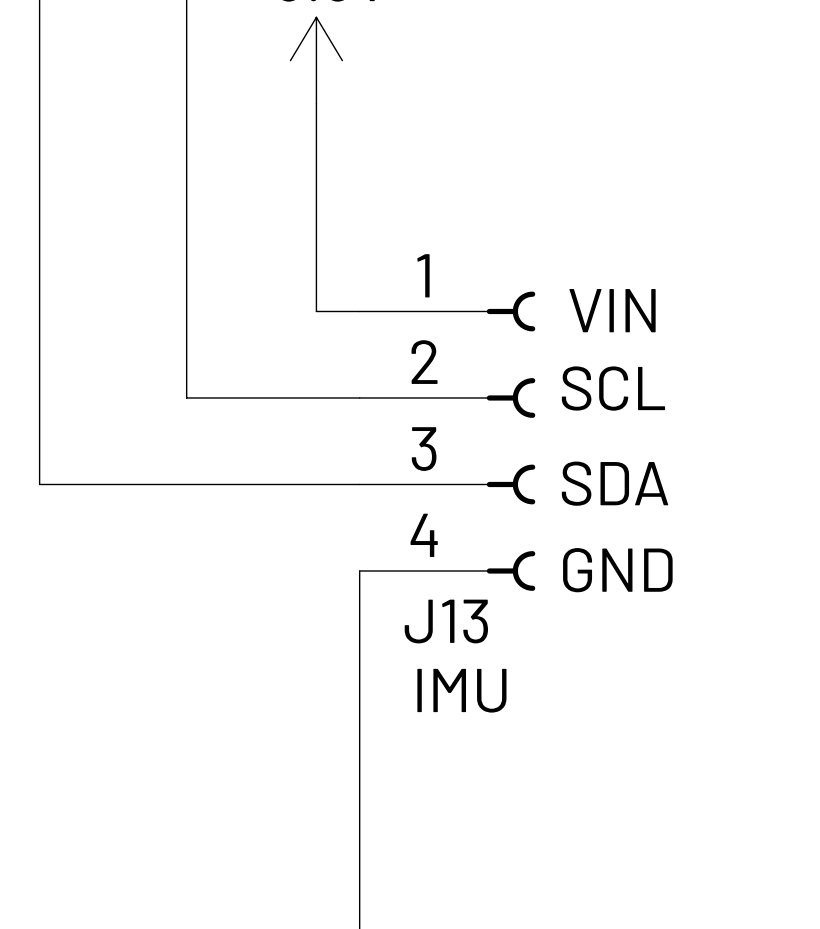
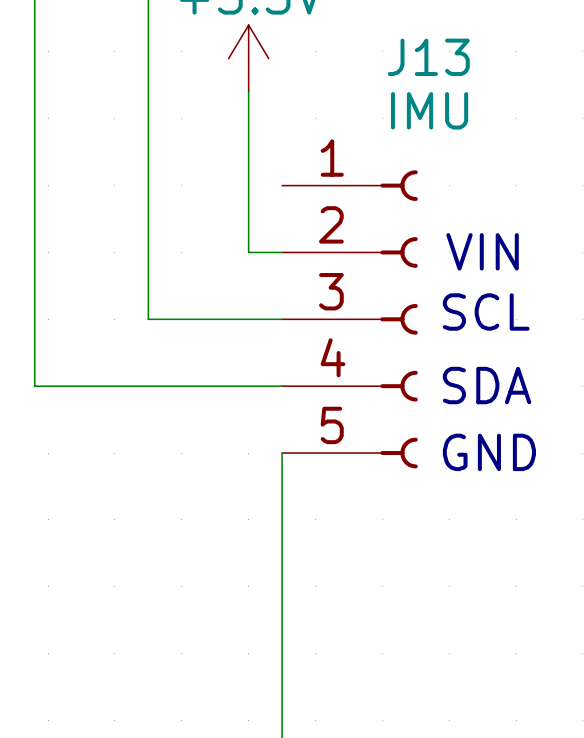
J13 symbol: [359, 291, 536, 591] -> [282, 170, 418, 469]
J13 name position: J13 (446, 621) -> J13 (428, 57)
J13 value position: IMU (461, 690) -> IMU (429, 110)

